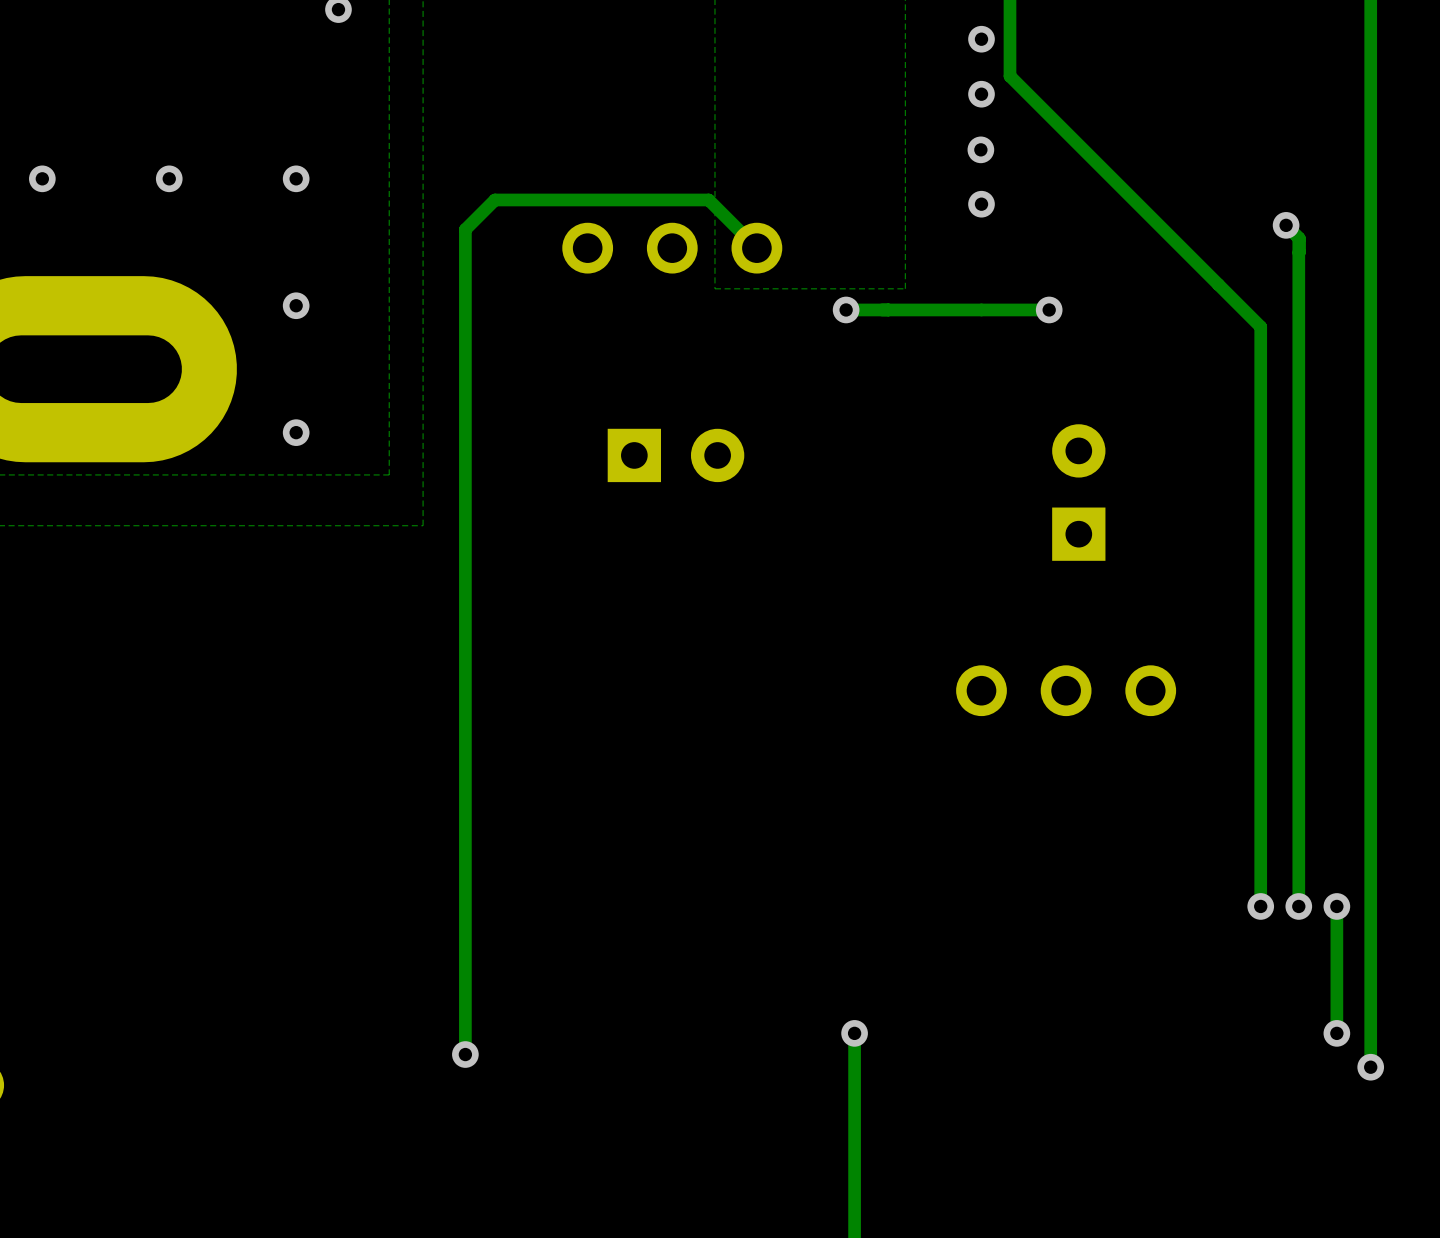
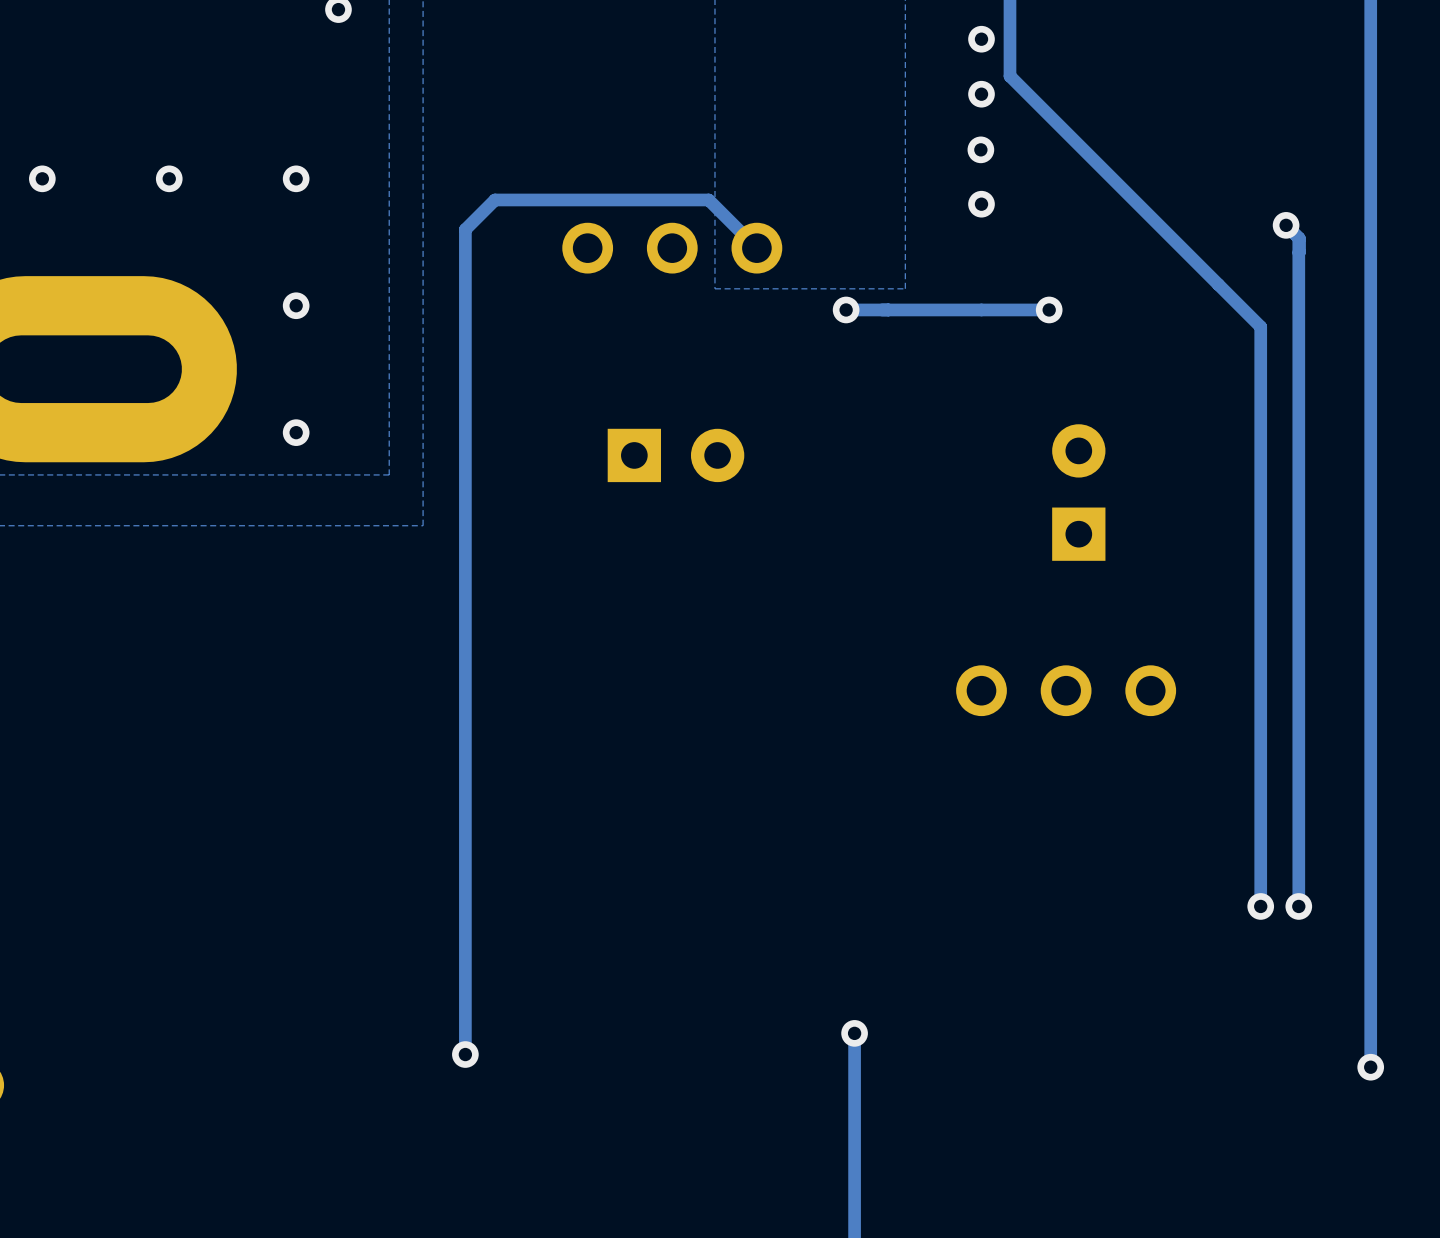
track: (1336, 906) (1336, 1033) -> none
via: (1336, 906) -> none
via: (1336, 1033) -> none

